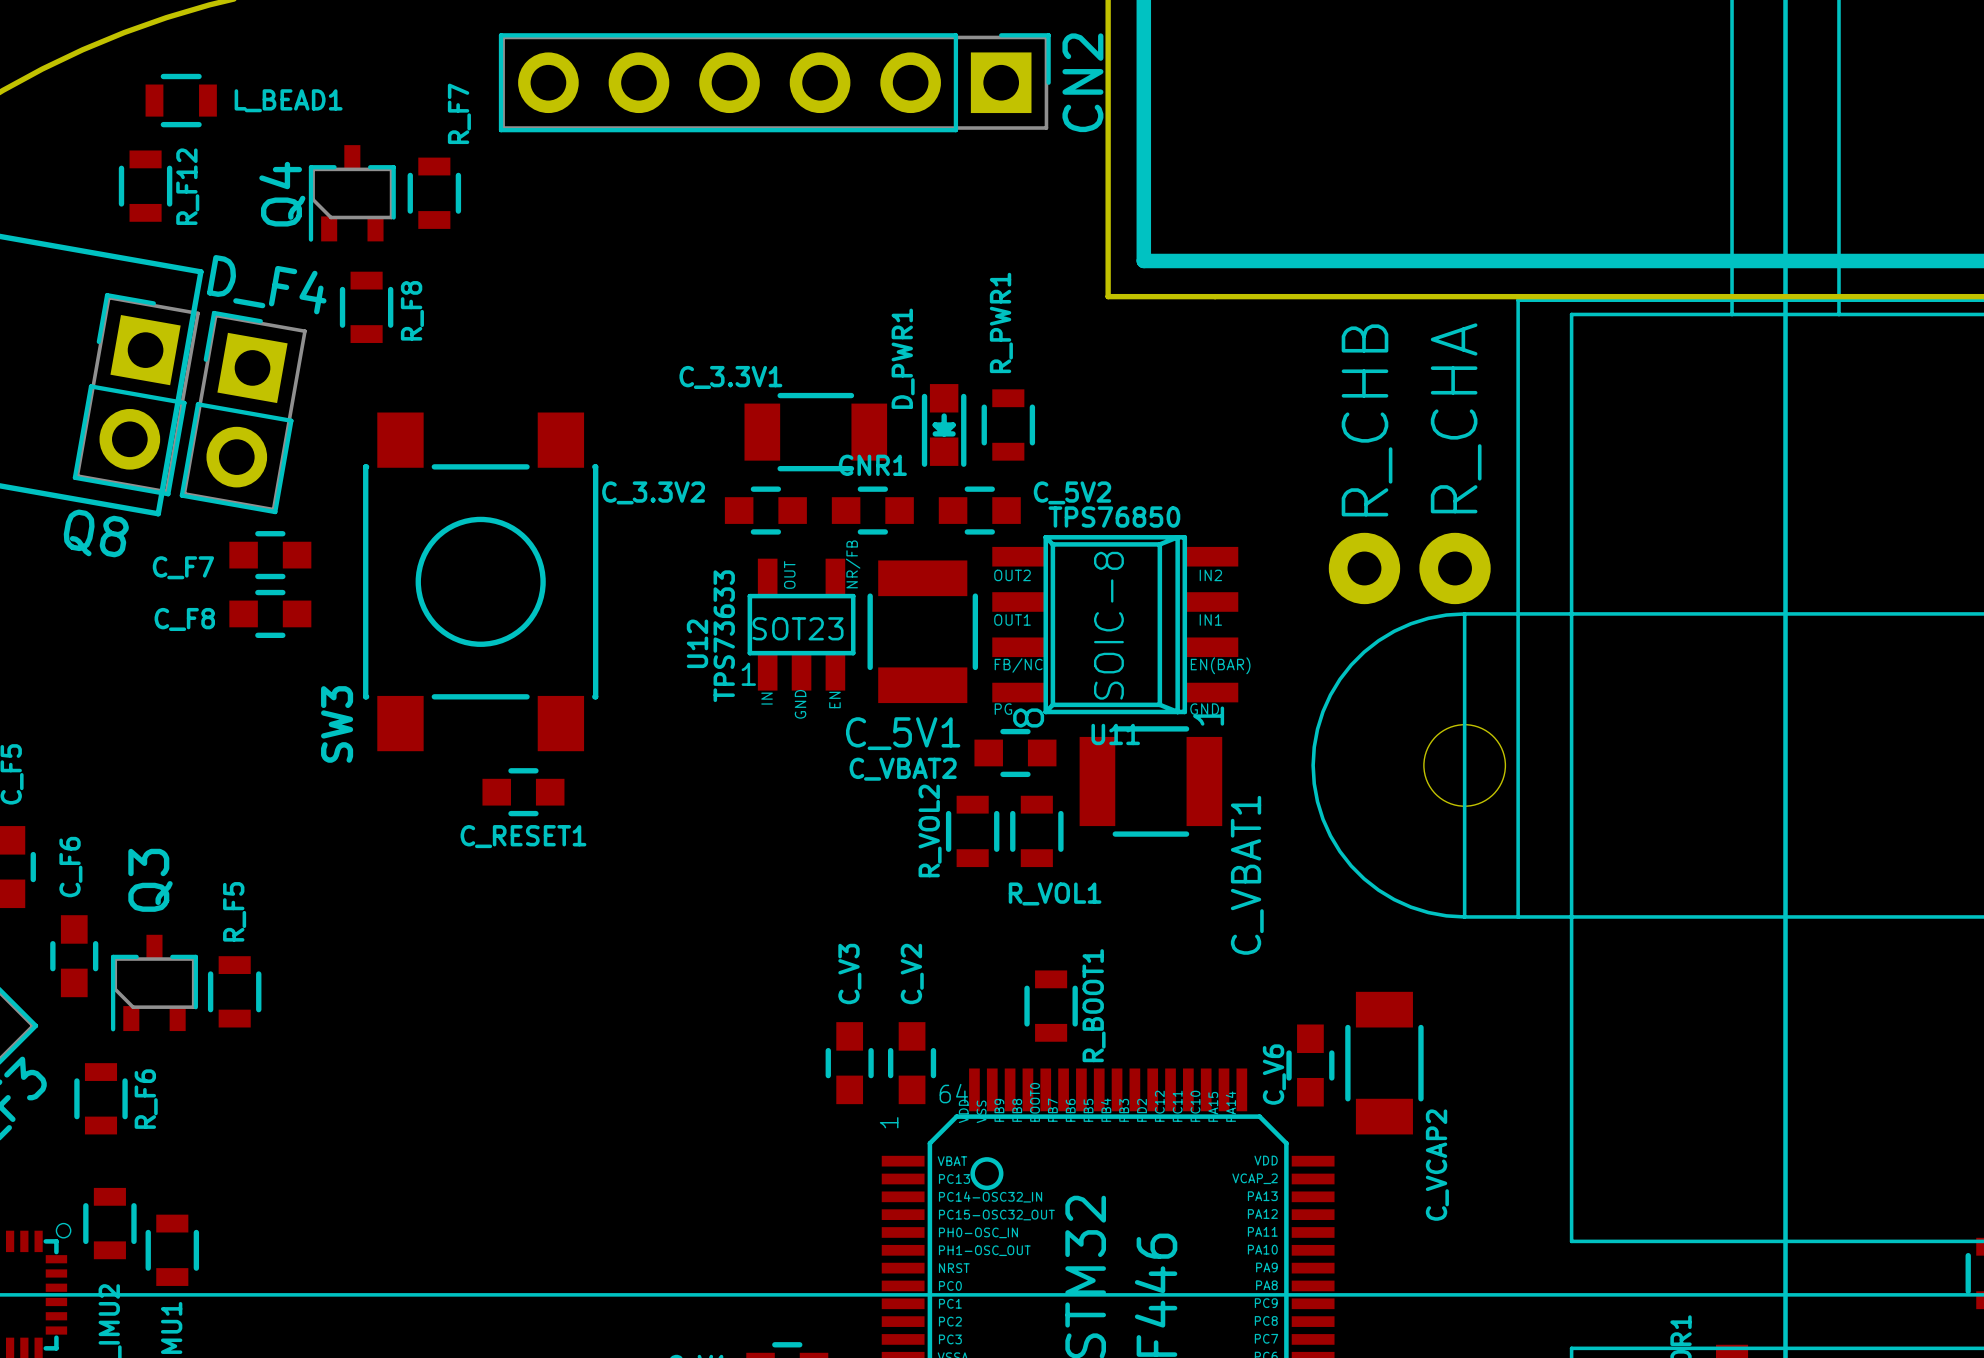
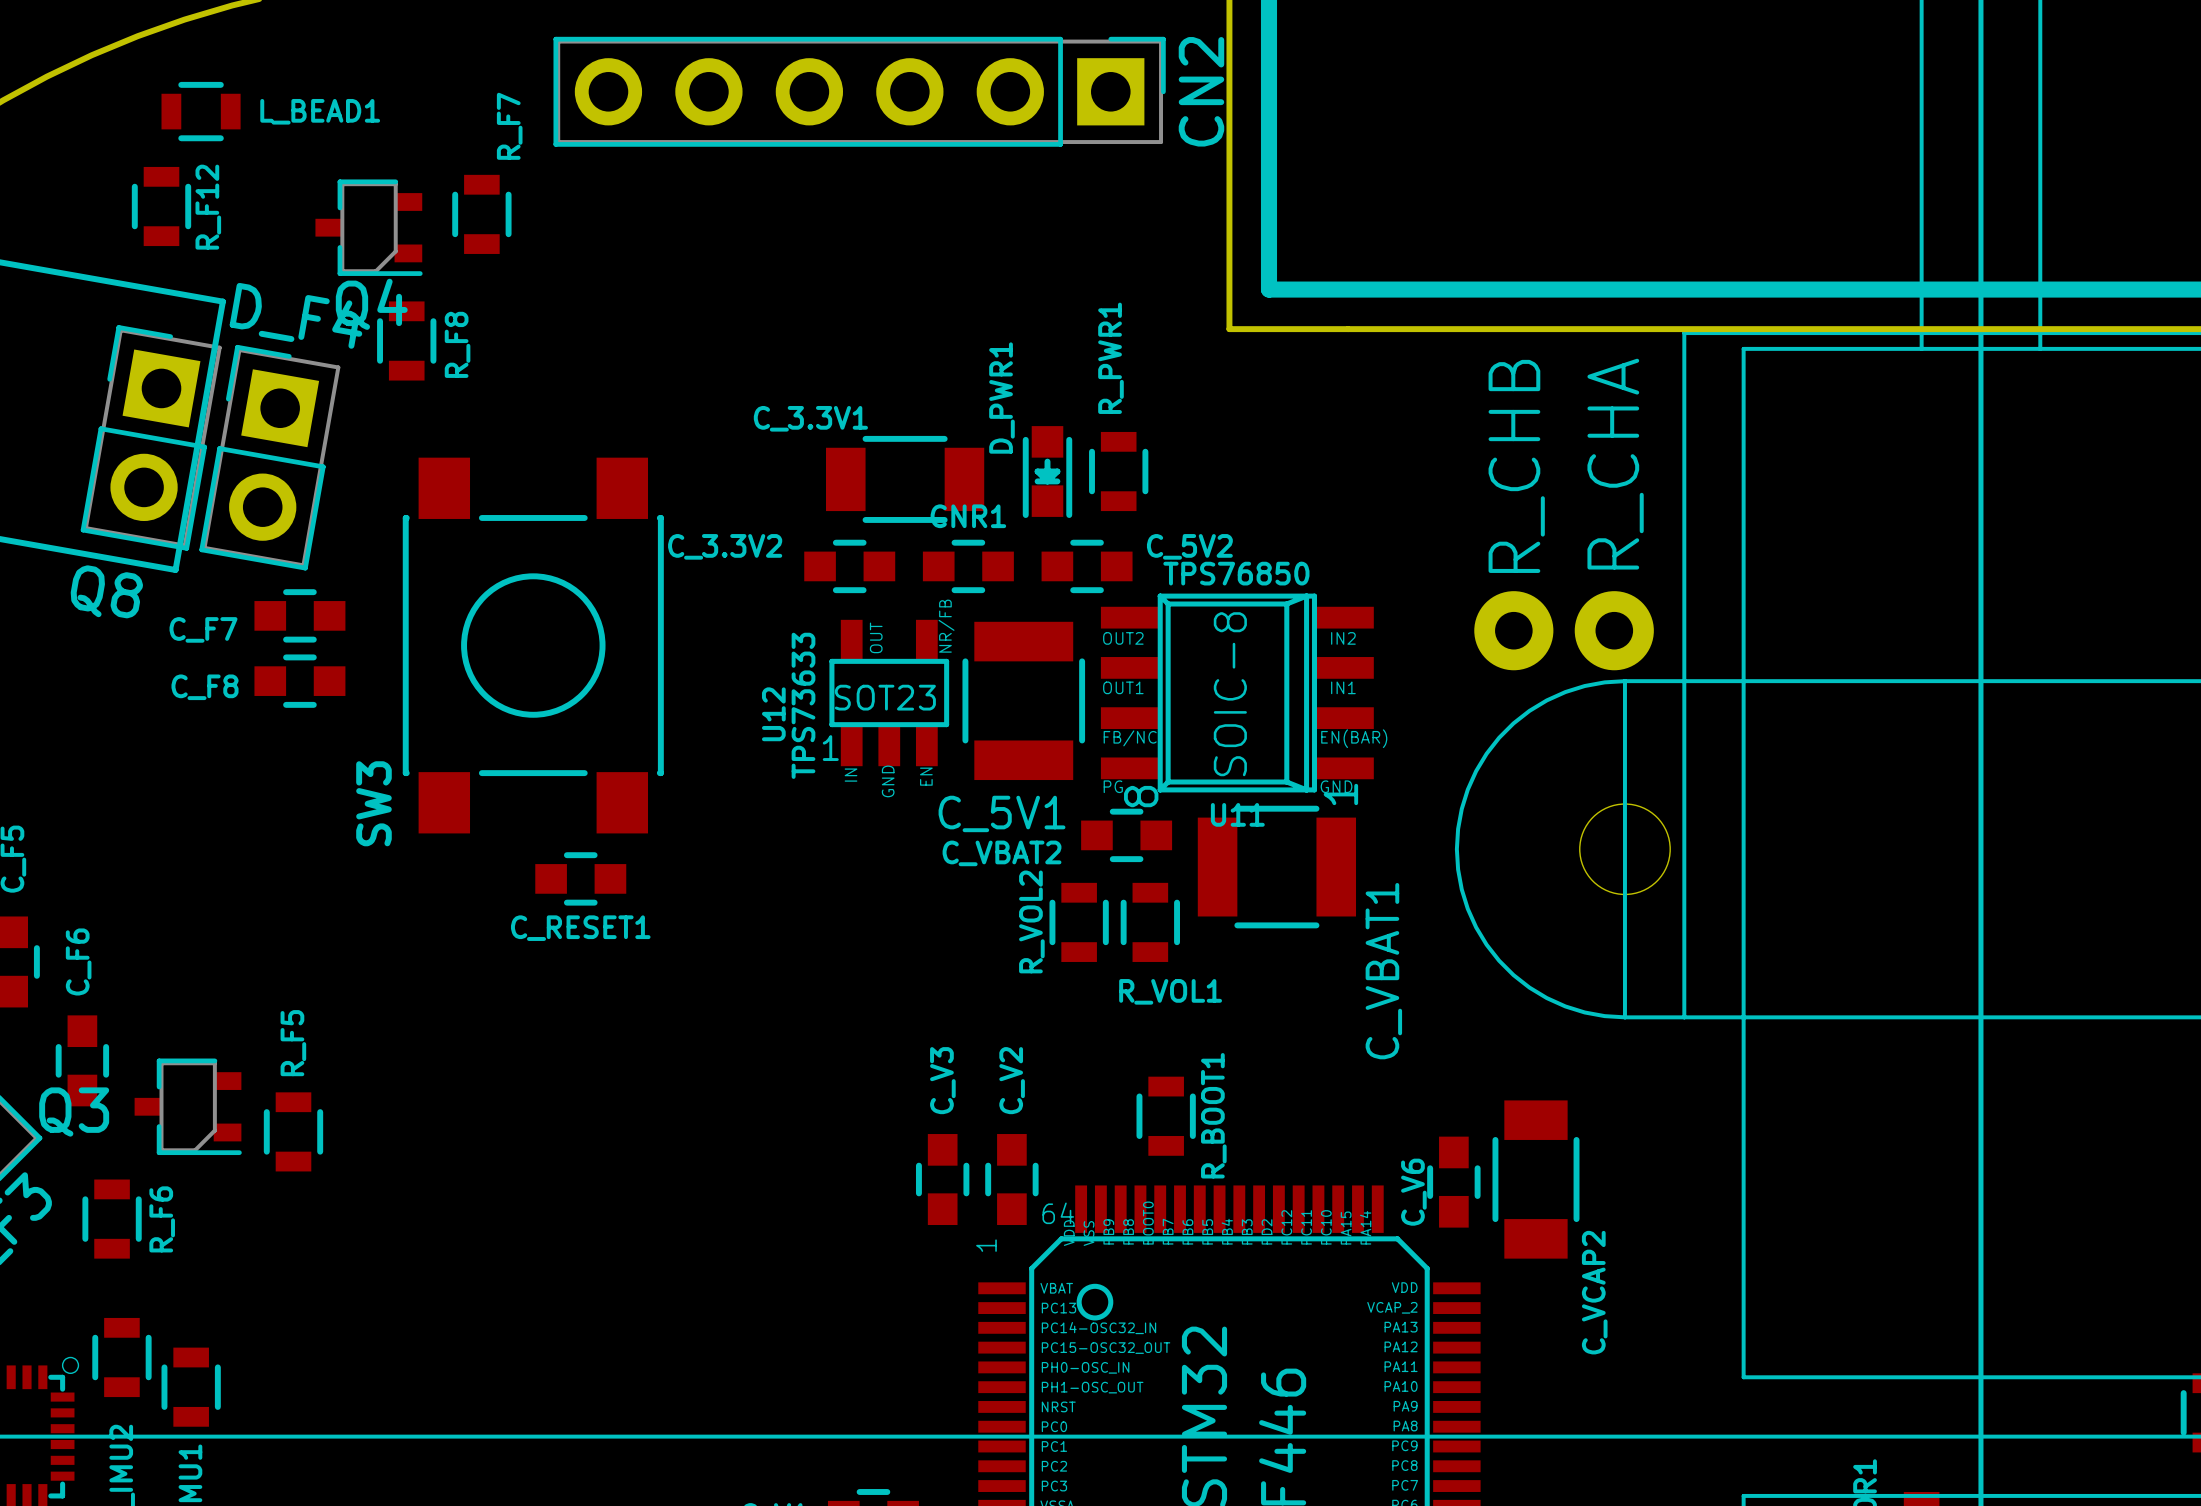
Q4 rotation: 0° (352, 193) -> 90° counterclockwise (369, 227)
Q3 rotation: 0° (154, 983) -> 90° counterclockwise (188, 1106)
R_F5 position: (234, 991) -> (293, 1131)

